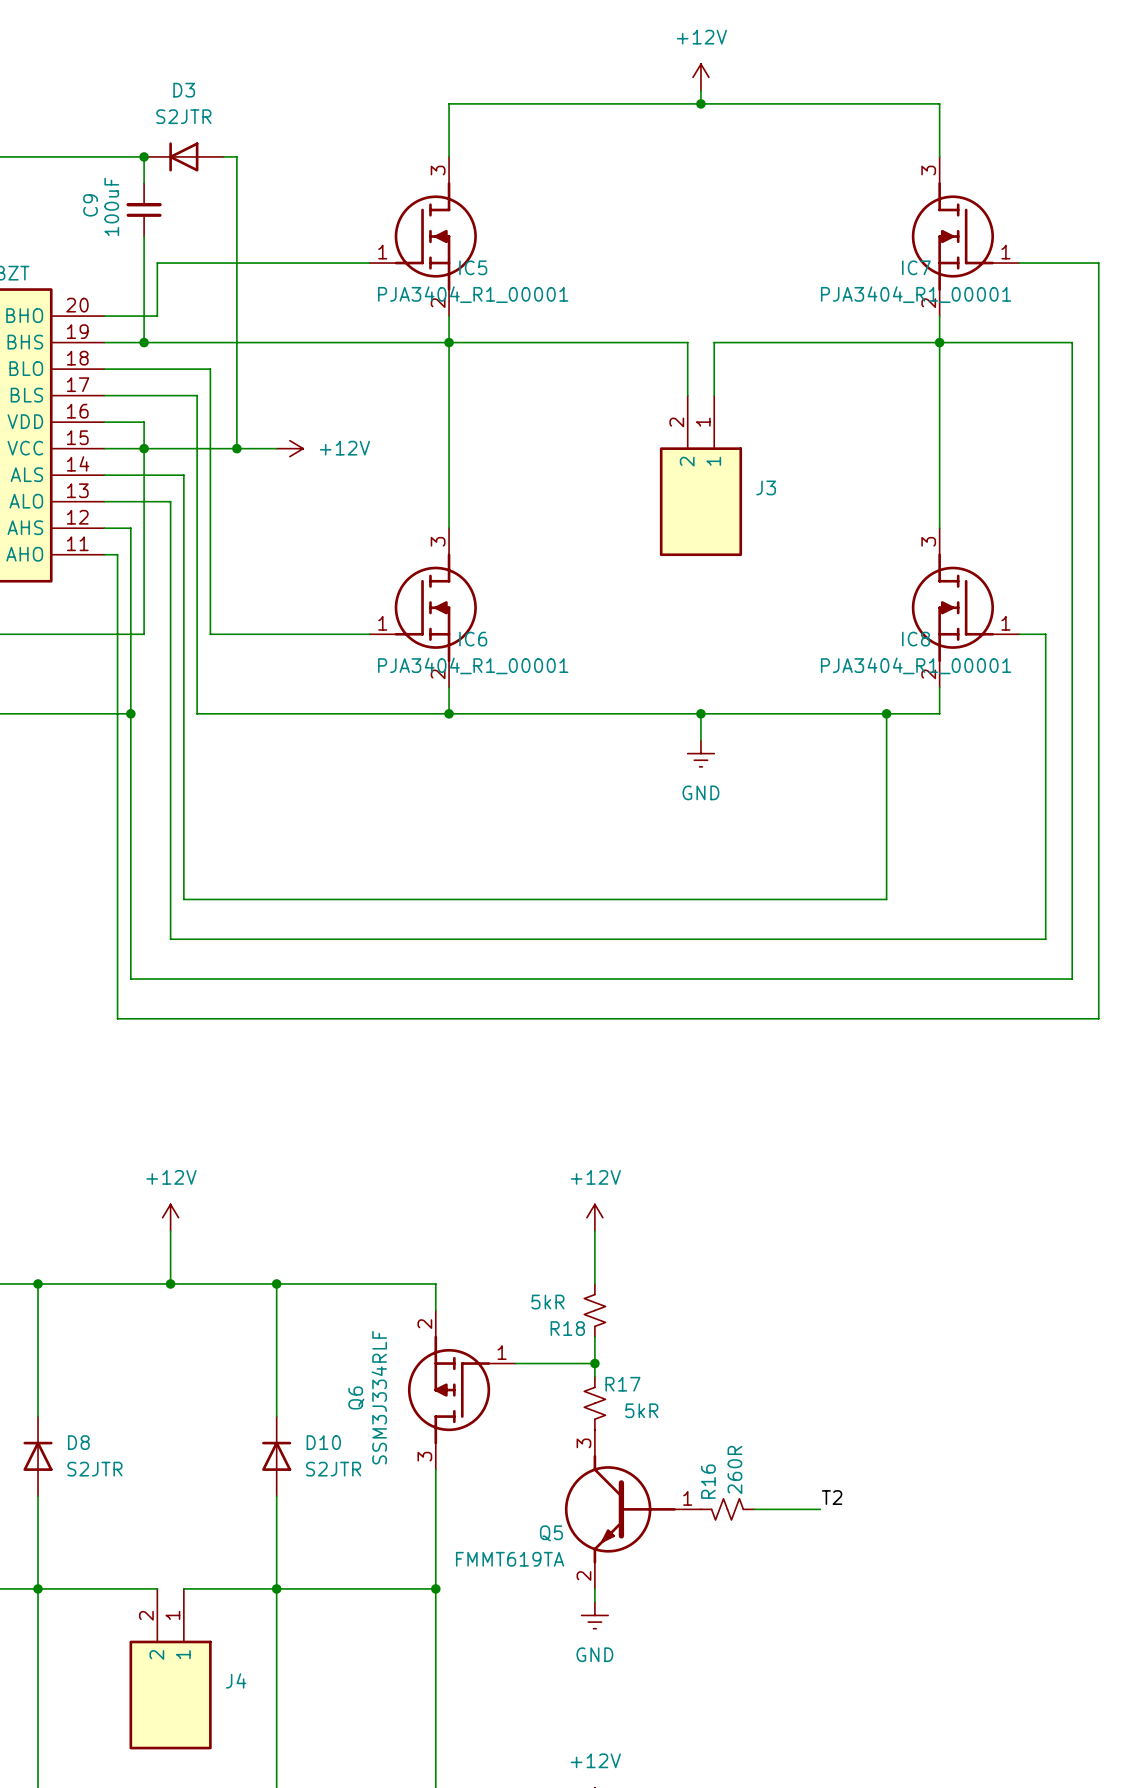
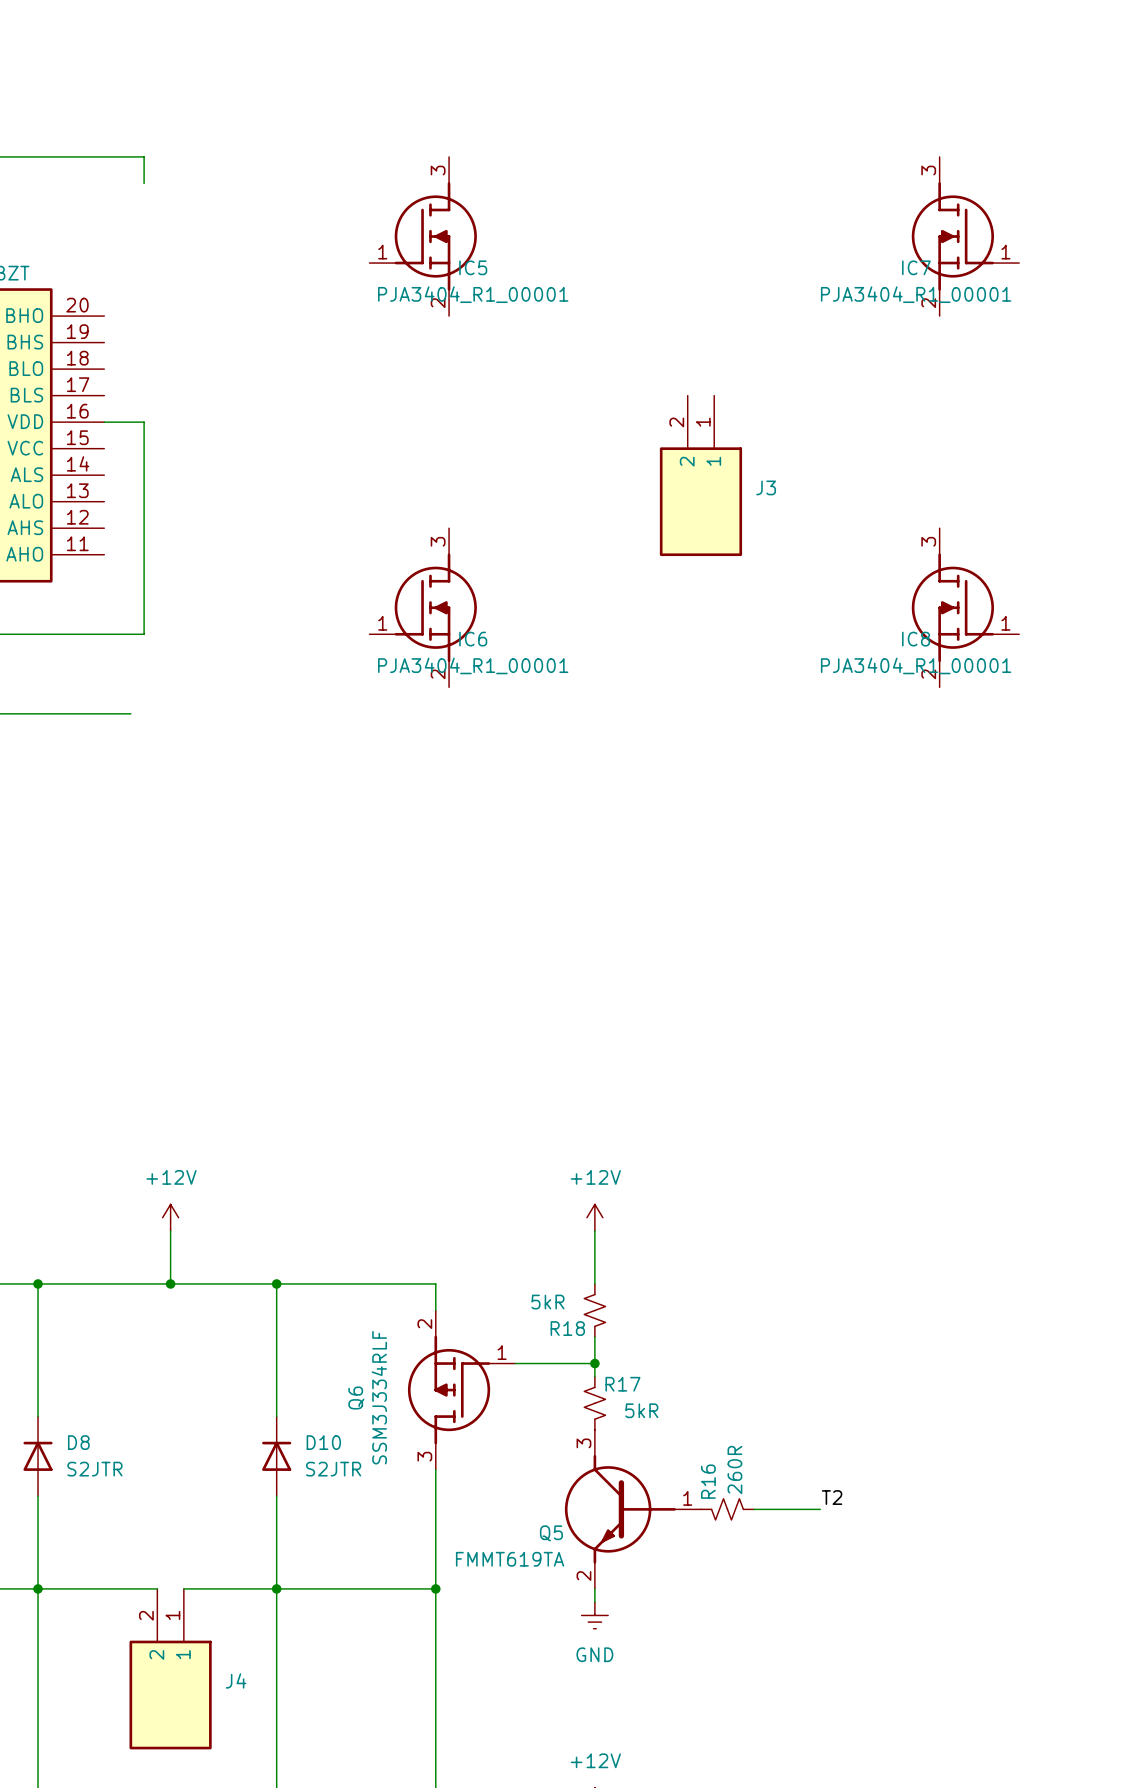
power symbol: +12V (700, 77) -> none
wire: (700, 90) (700, 103) -> none
junction: (700, 103) -> none
junction: (144, 156) -> none
D3: S2JTR (183, 156) -> none
wire: (223, 156) (236, 156) (236, 448) -> none
wire: (449, 156) (449, 103) (939, 103) (939, 156) -> none
C9: 100uF (144, 209) -> none
wire: (144, 236) (144, 342) -> none
wire: (369, 263) (157, 263) (157, 316) (104, 316) -> none
wire: (1019, 263) (1098, 263) (1098, 1018) (117, 1018) (117, 554) (104, 554) -> none
wire: (449, 316) (449, 528) -> none
wire: (939, 316) (939, 528) -> none
wire: (104, 342) (687, 342) (687, 395) -> none
junction: (144, 342) -> none
junction: (449, 342) -> none
junction: (939, 342) -> none
wire: (104, 369) (210, 369) (210, 634) (369, 634) -> none
wire: (104, 395) (197, 395) (197, 713) (939, 713) (939, 687) -> none
wire: (714, 395) (714, 342) (1072, 342) (1072, 979) (130, 979) (130, 528) (104, 528) -> none
wire: (104, 448) (276, 448) -> none
junction: (144, 448) -> none
junction: (236, 448) -> none
power symbol: +12V (289, 448) -> none
wire: (104, 475) (183, 475) (183, 899) (886, 899) (886, 713) -> none
wire: (104, 501) (170, 501) (170, 939) (1045, 939) (1045, 634) (1019, 634) -> none
wire: (449, 687) (449, 713) -> none
junction: (130, 713) -> none
junction: (449, 713) -> none
wire: (700, 713) (700, 740) -> none
junction: (700, 713) -> none
junction: (886, 713) -> none
power symbol: GND (700, 753) -> none

